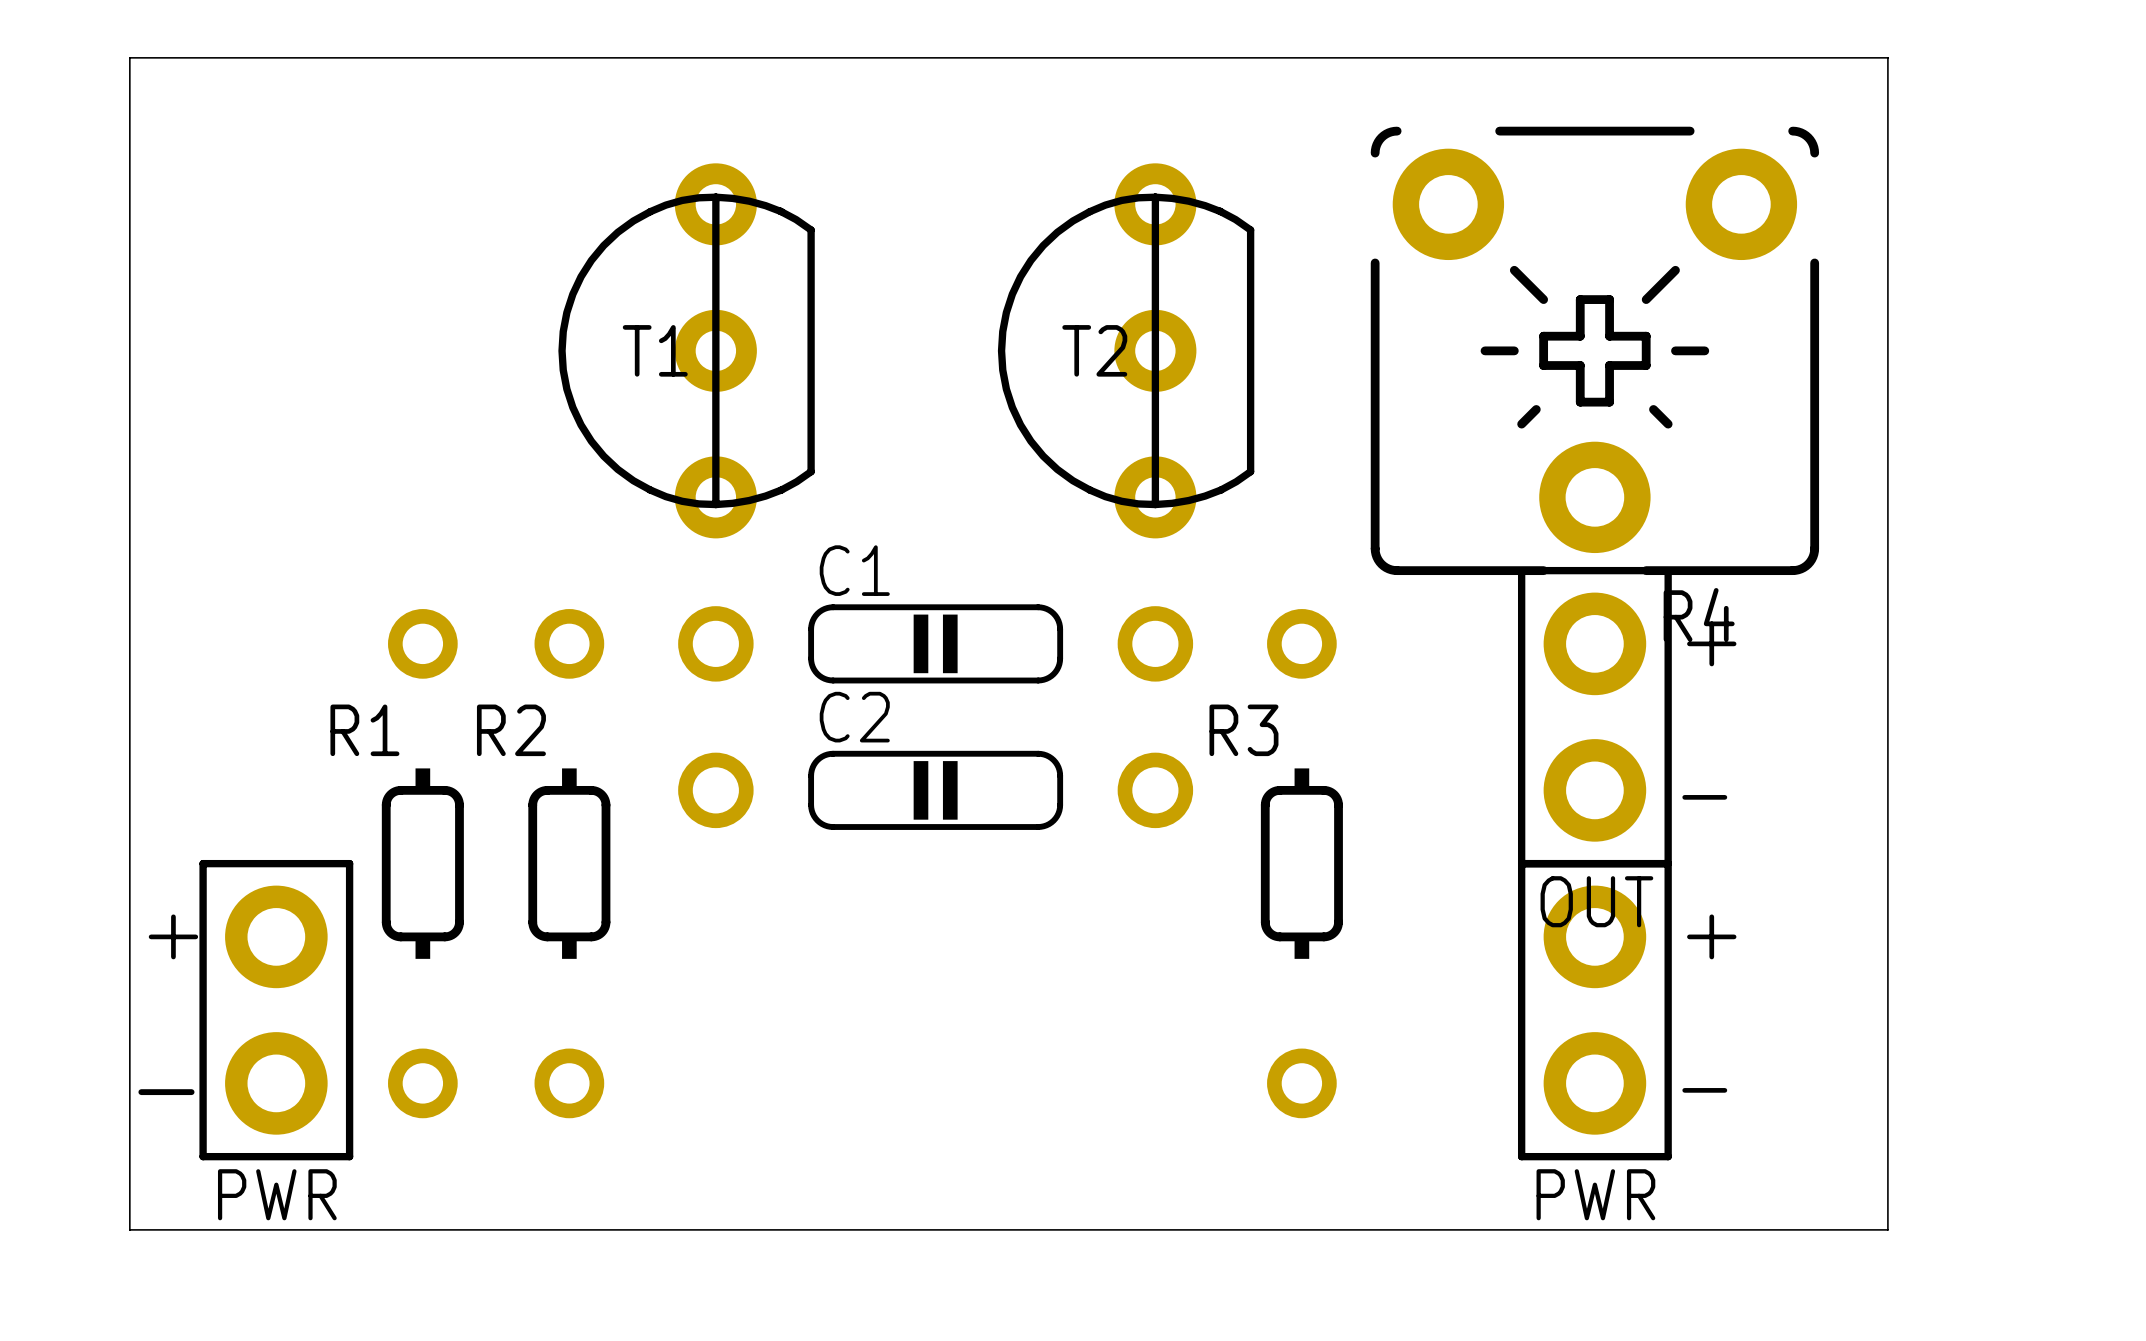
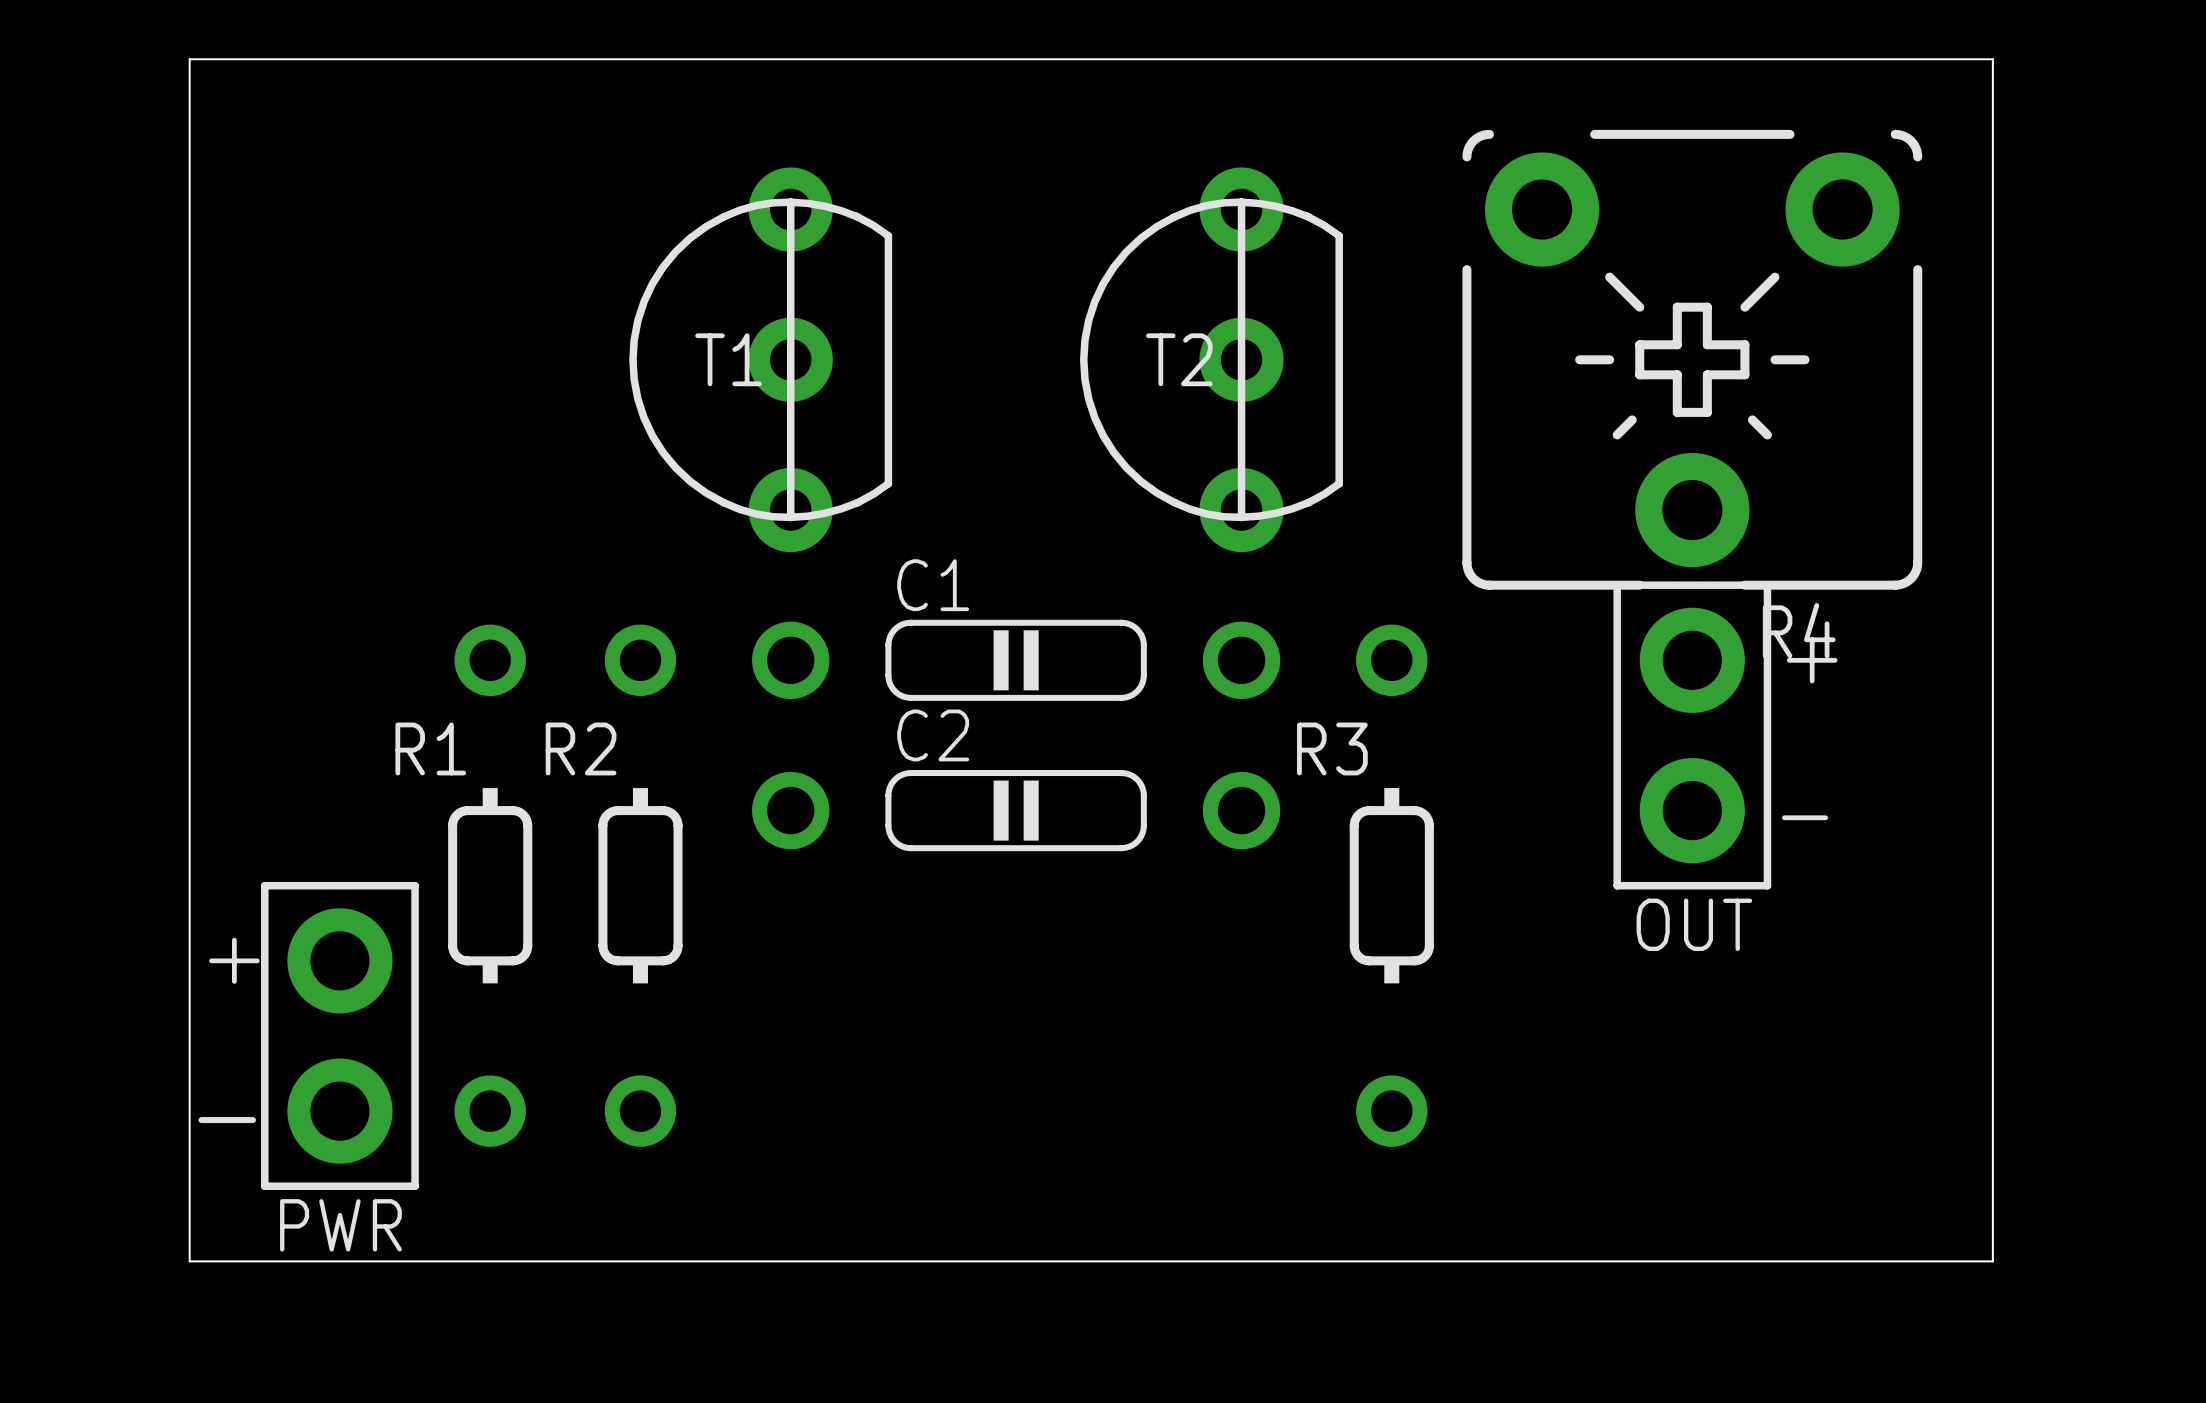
PWR: (1594, 1010) -> none

